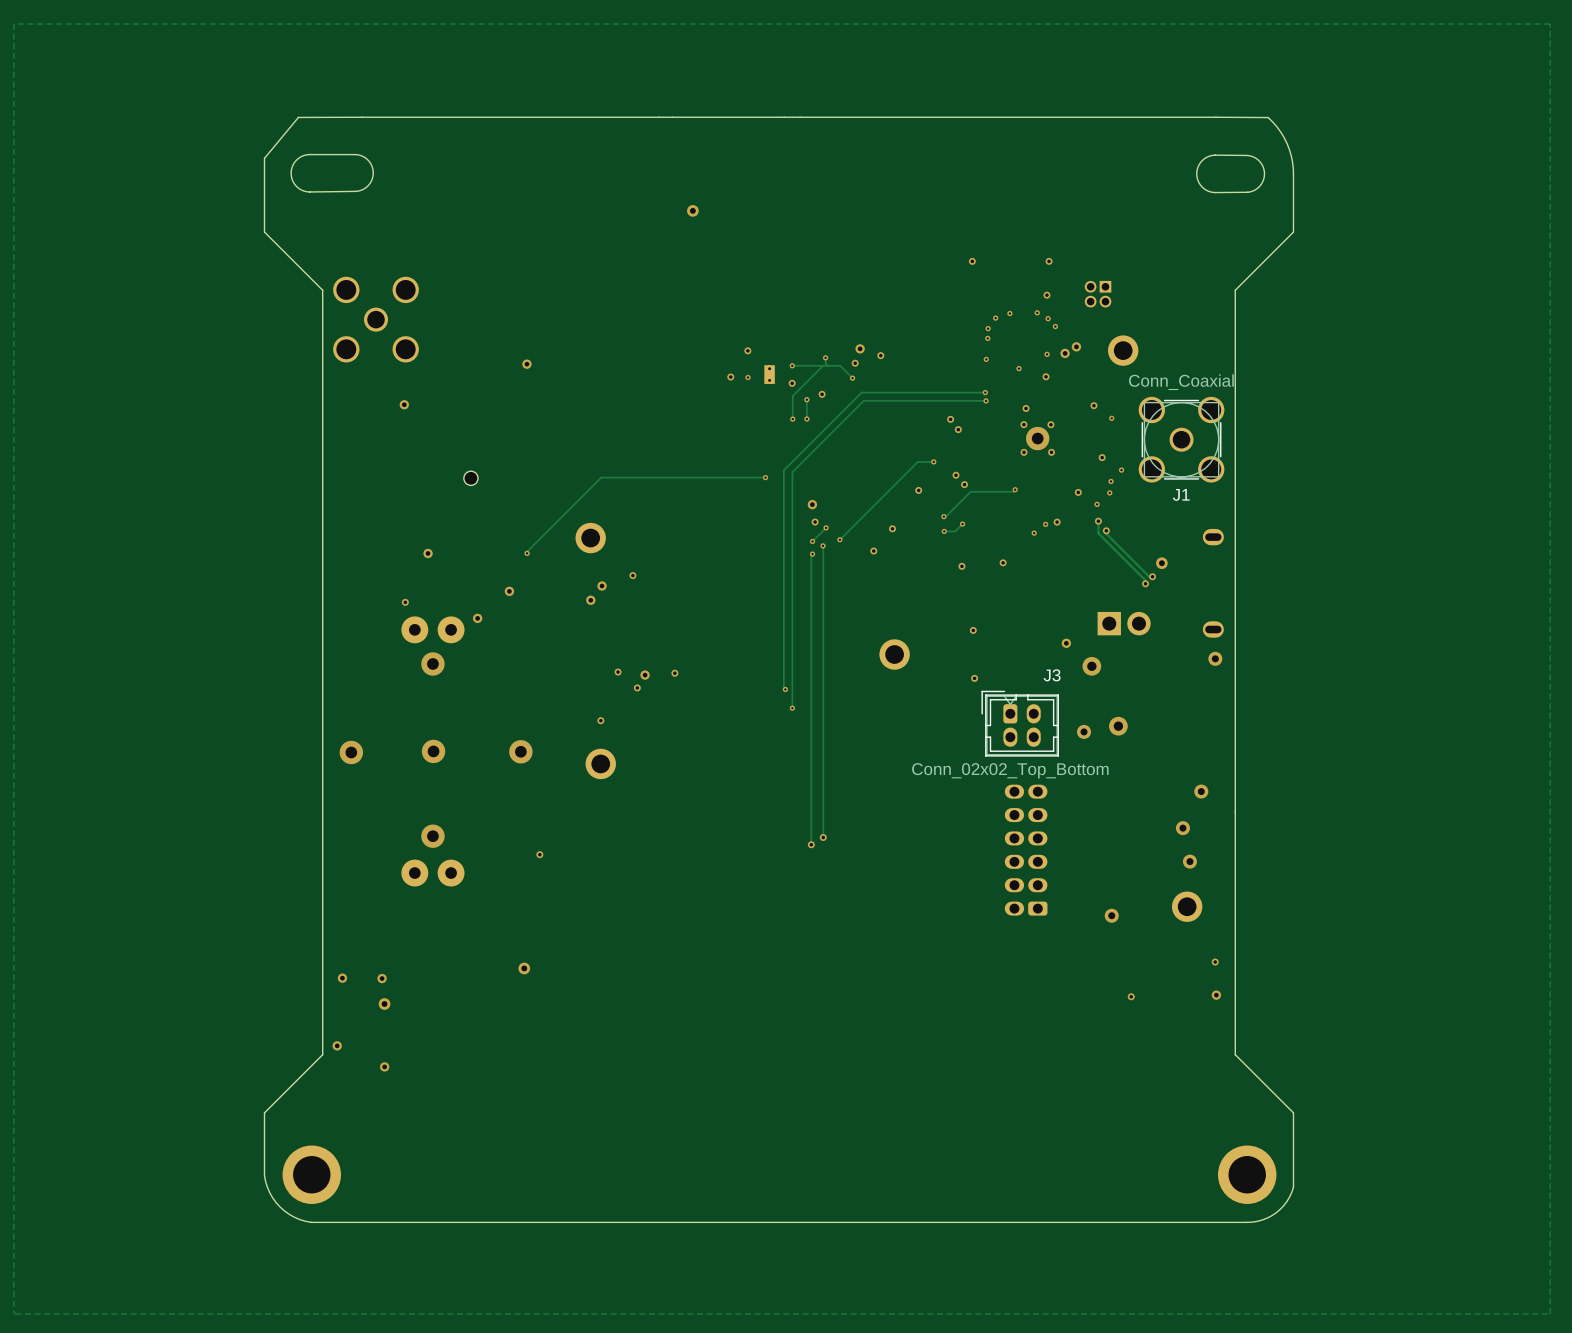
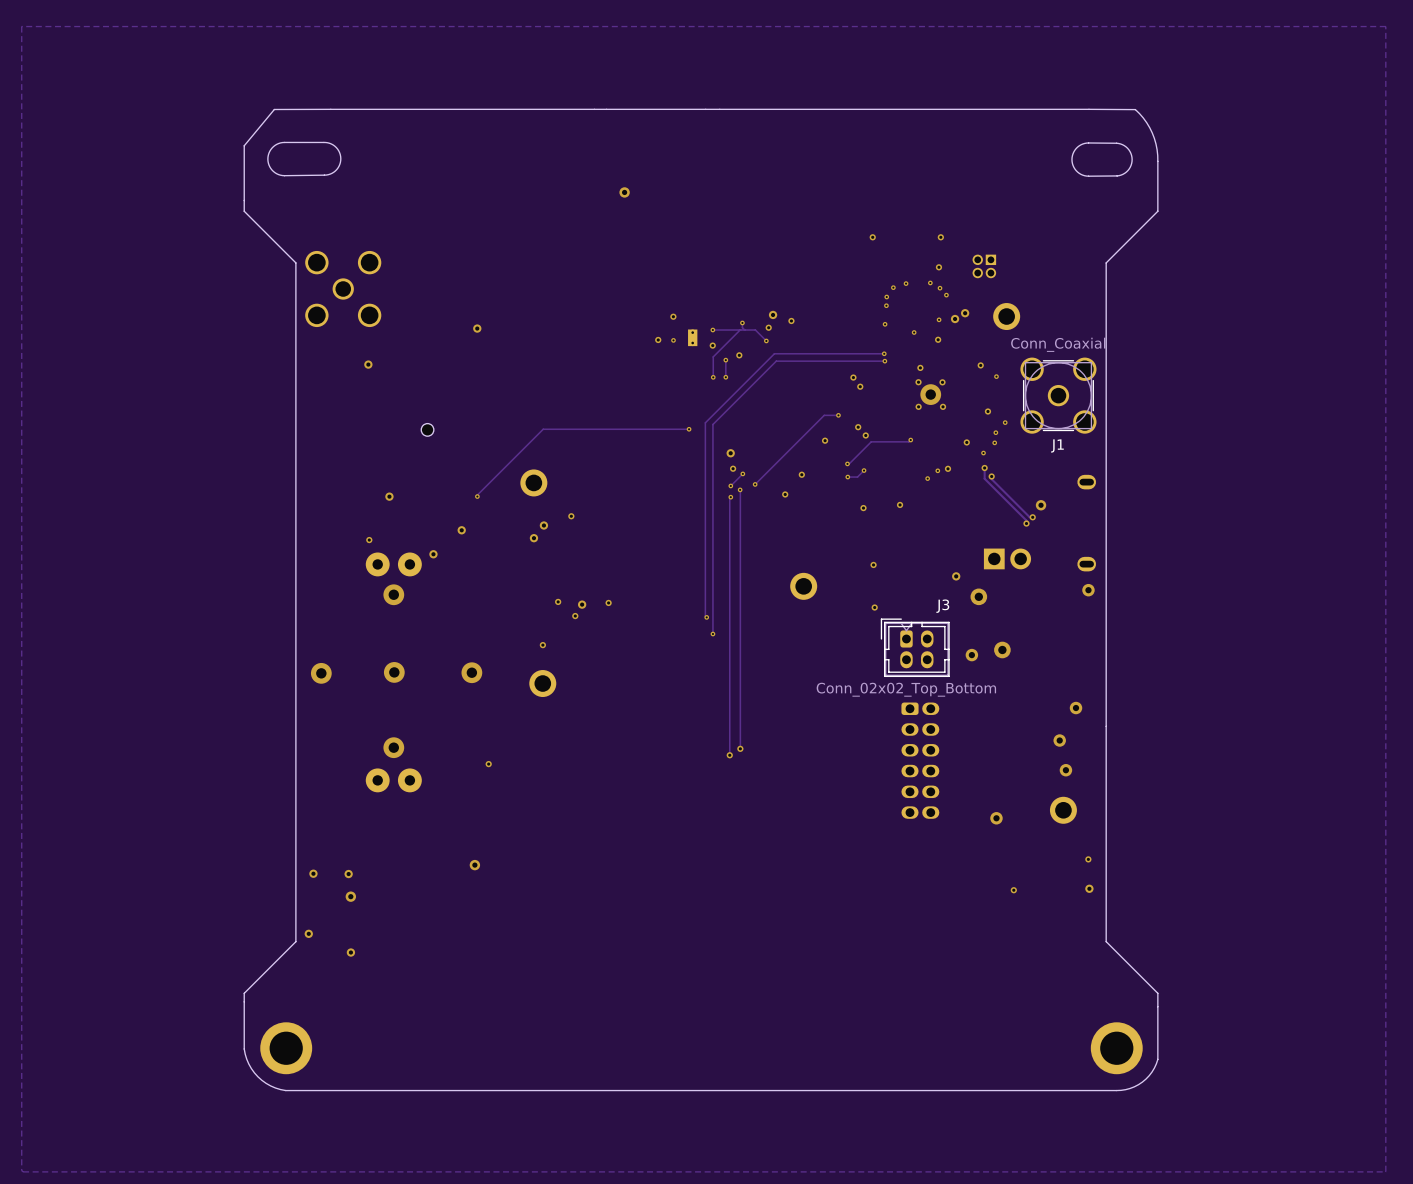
part rotation: 0° (1026, 850) -> 180° (920, 760)

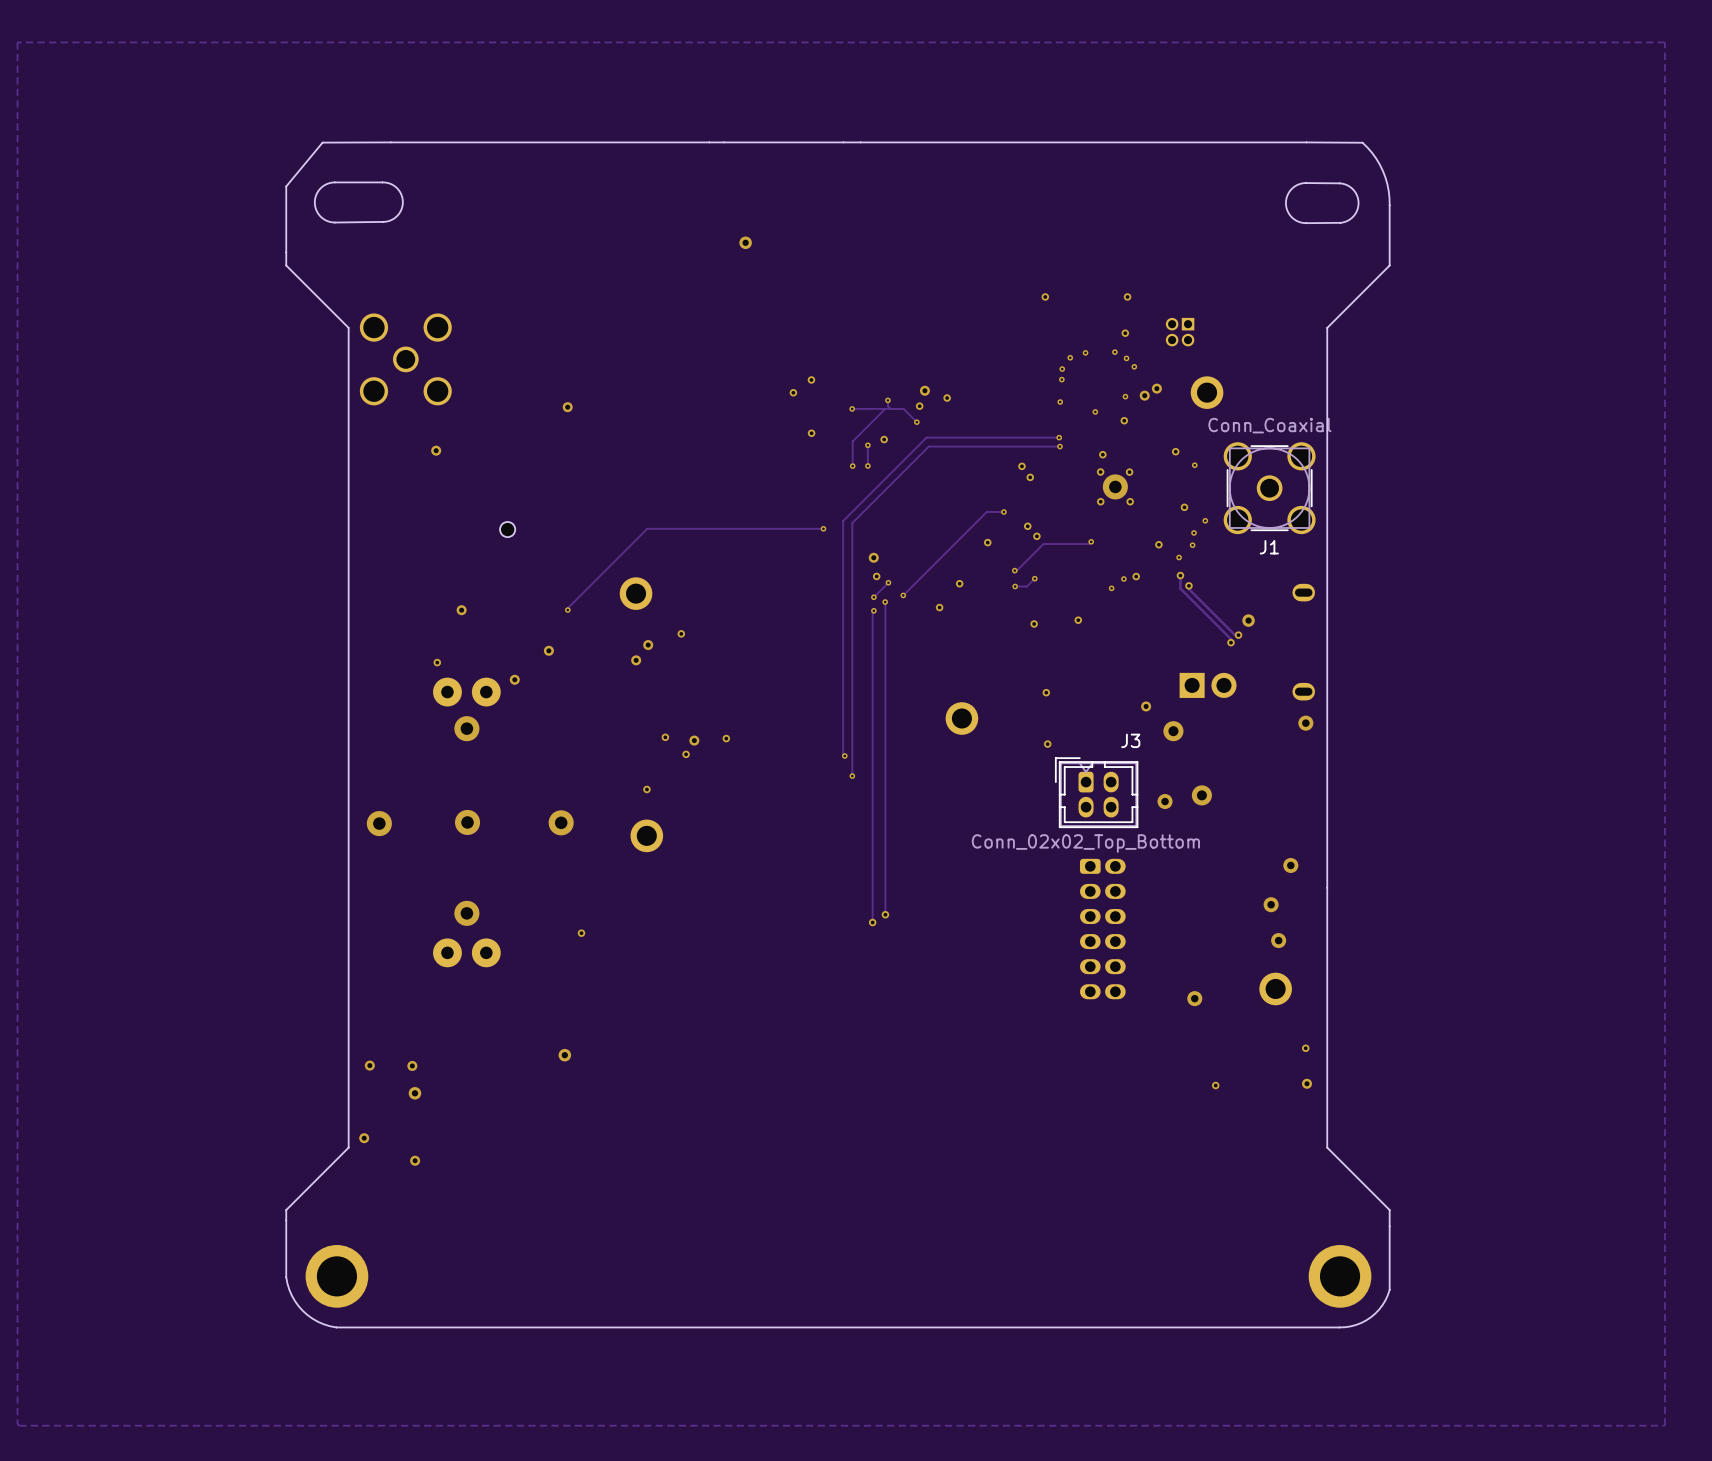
via: none -> (811, 379)
via: none -> (793, 392)
via: (673, 316) -> none
part: (692, 337) -> none
via: (658, 339) -> none
via: (673, 340) -> none
via: (712, 345) -> none
via: none -> (811, 433)

